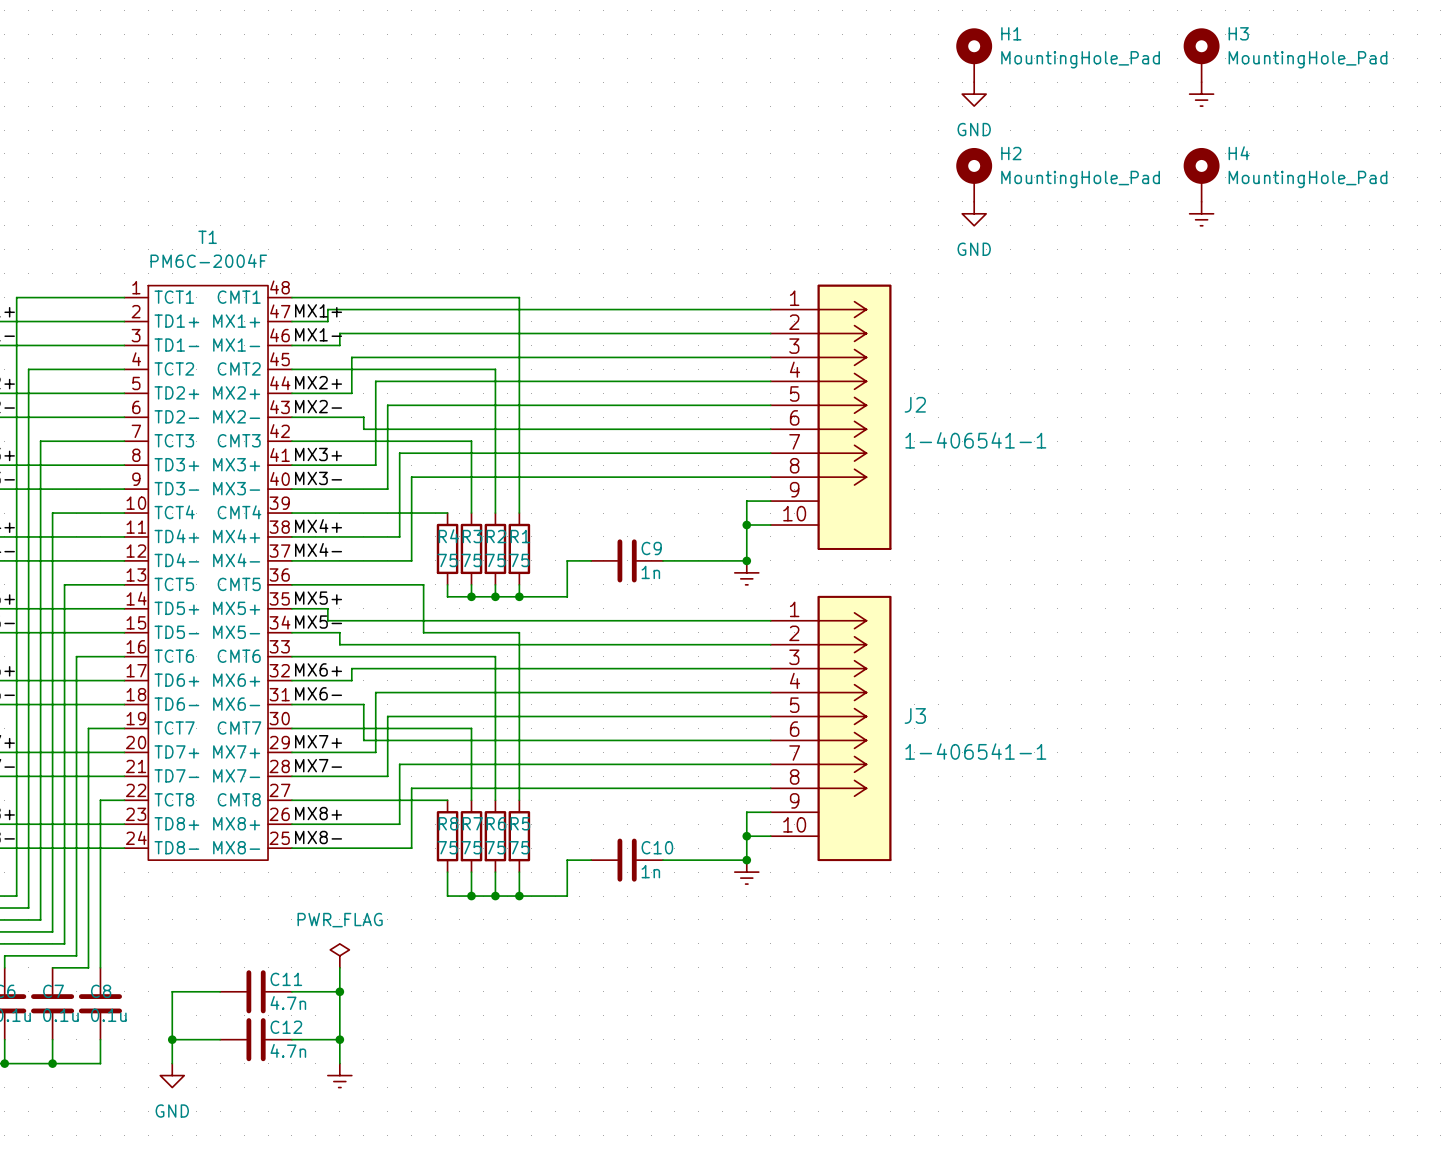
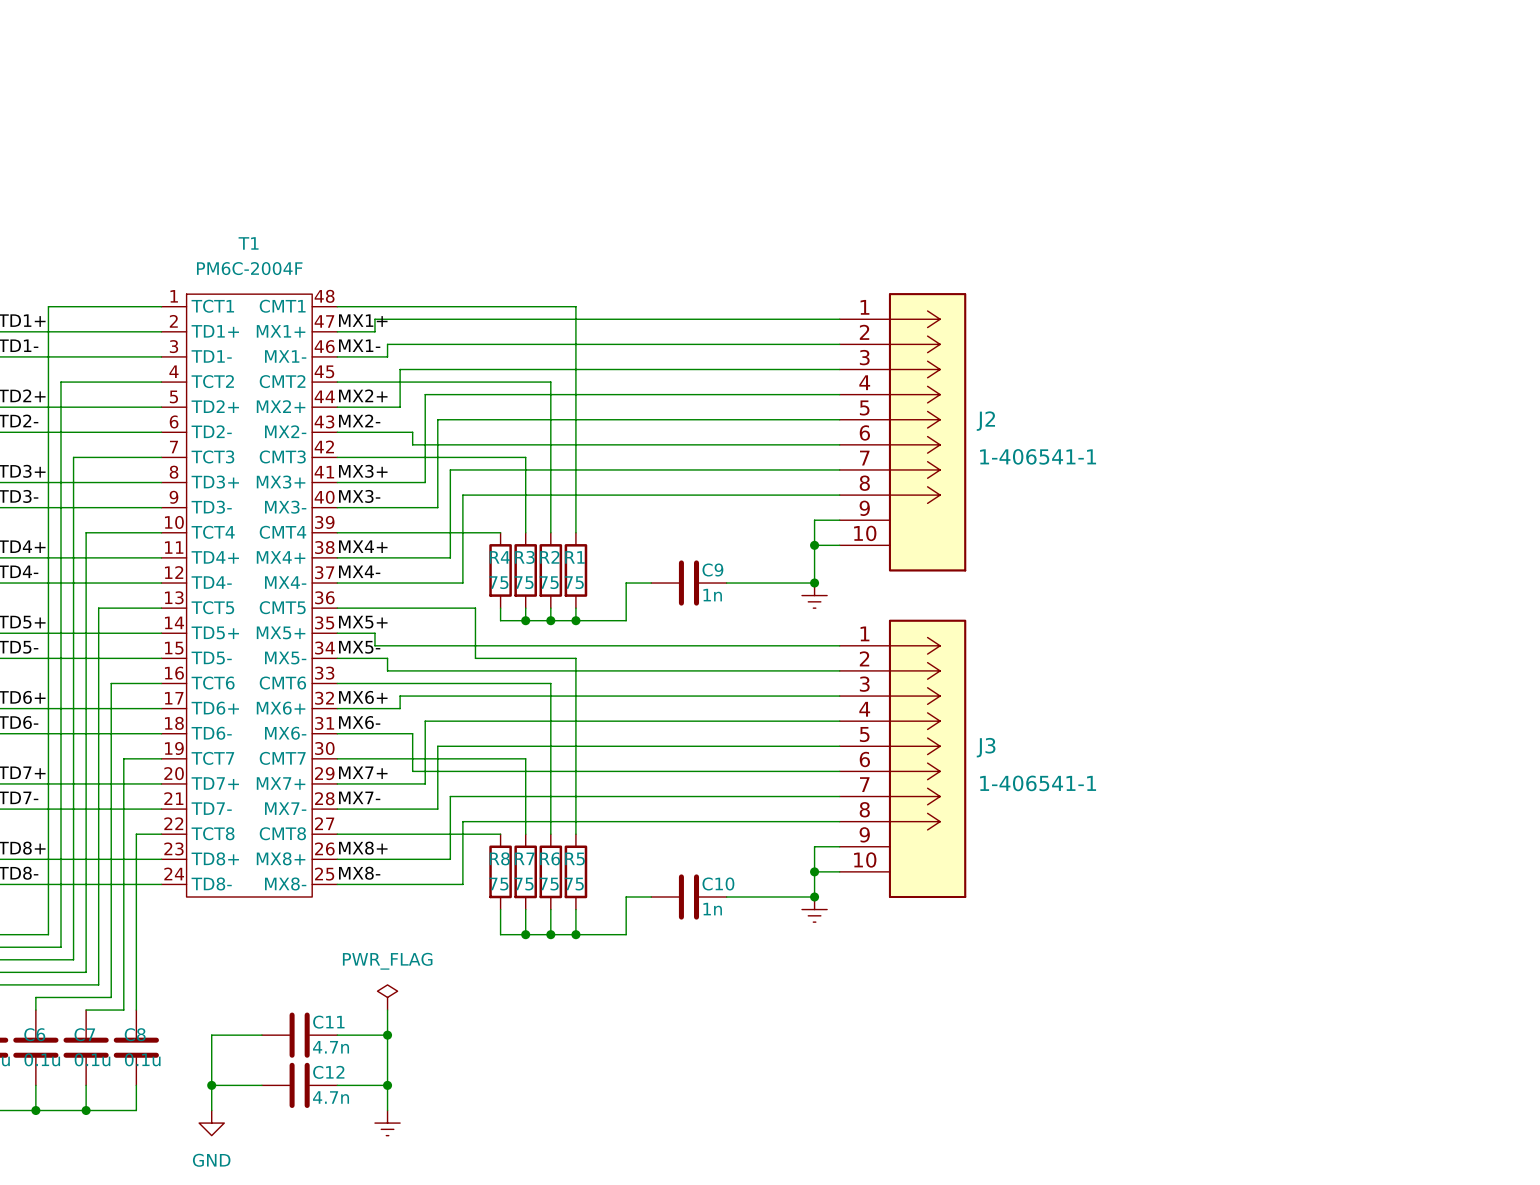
H1: MountingHole_Pad (974, 55) -> none
H3: MountingHole_Pad (1201, 55) -> none
power symbol: GND (974, 94) -> none
power symbol: (1201, 94) -> none
H2: MountingHole_Pad (974, 174) -> none
H4: MountingHole_Pad (1201, 174) -> none
power symbol: GND (974, 213) -> none
power symbol: (1201, 213) -> none

